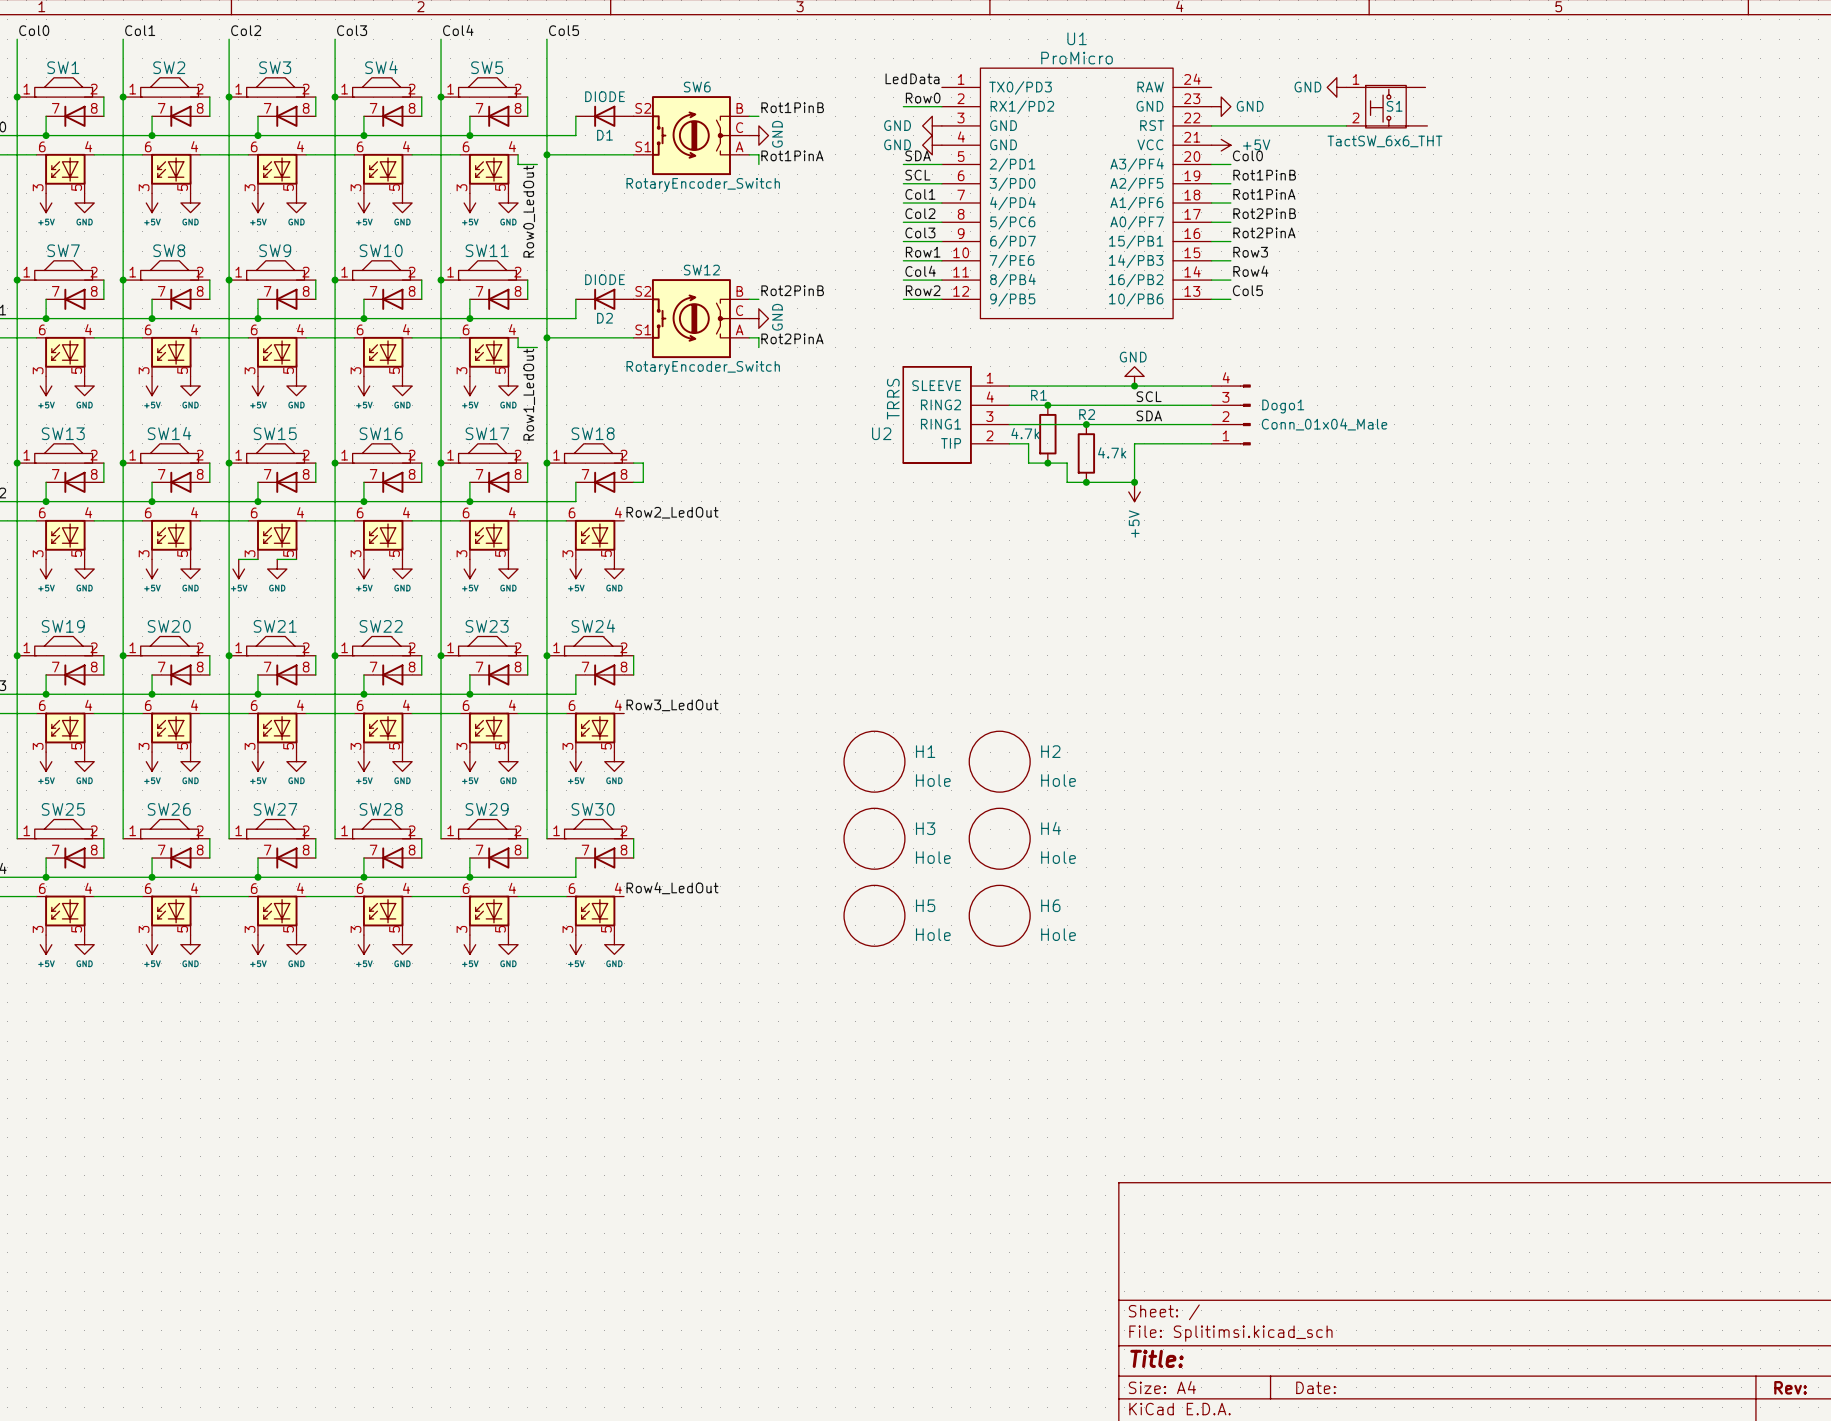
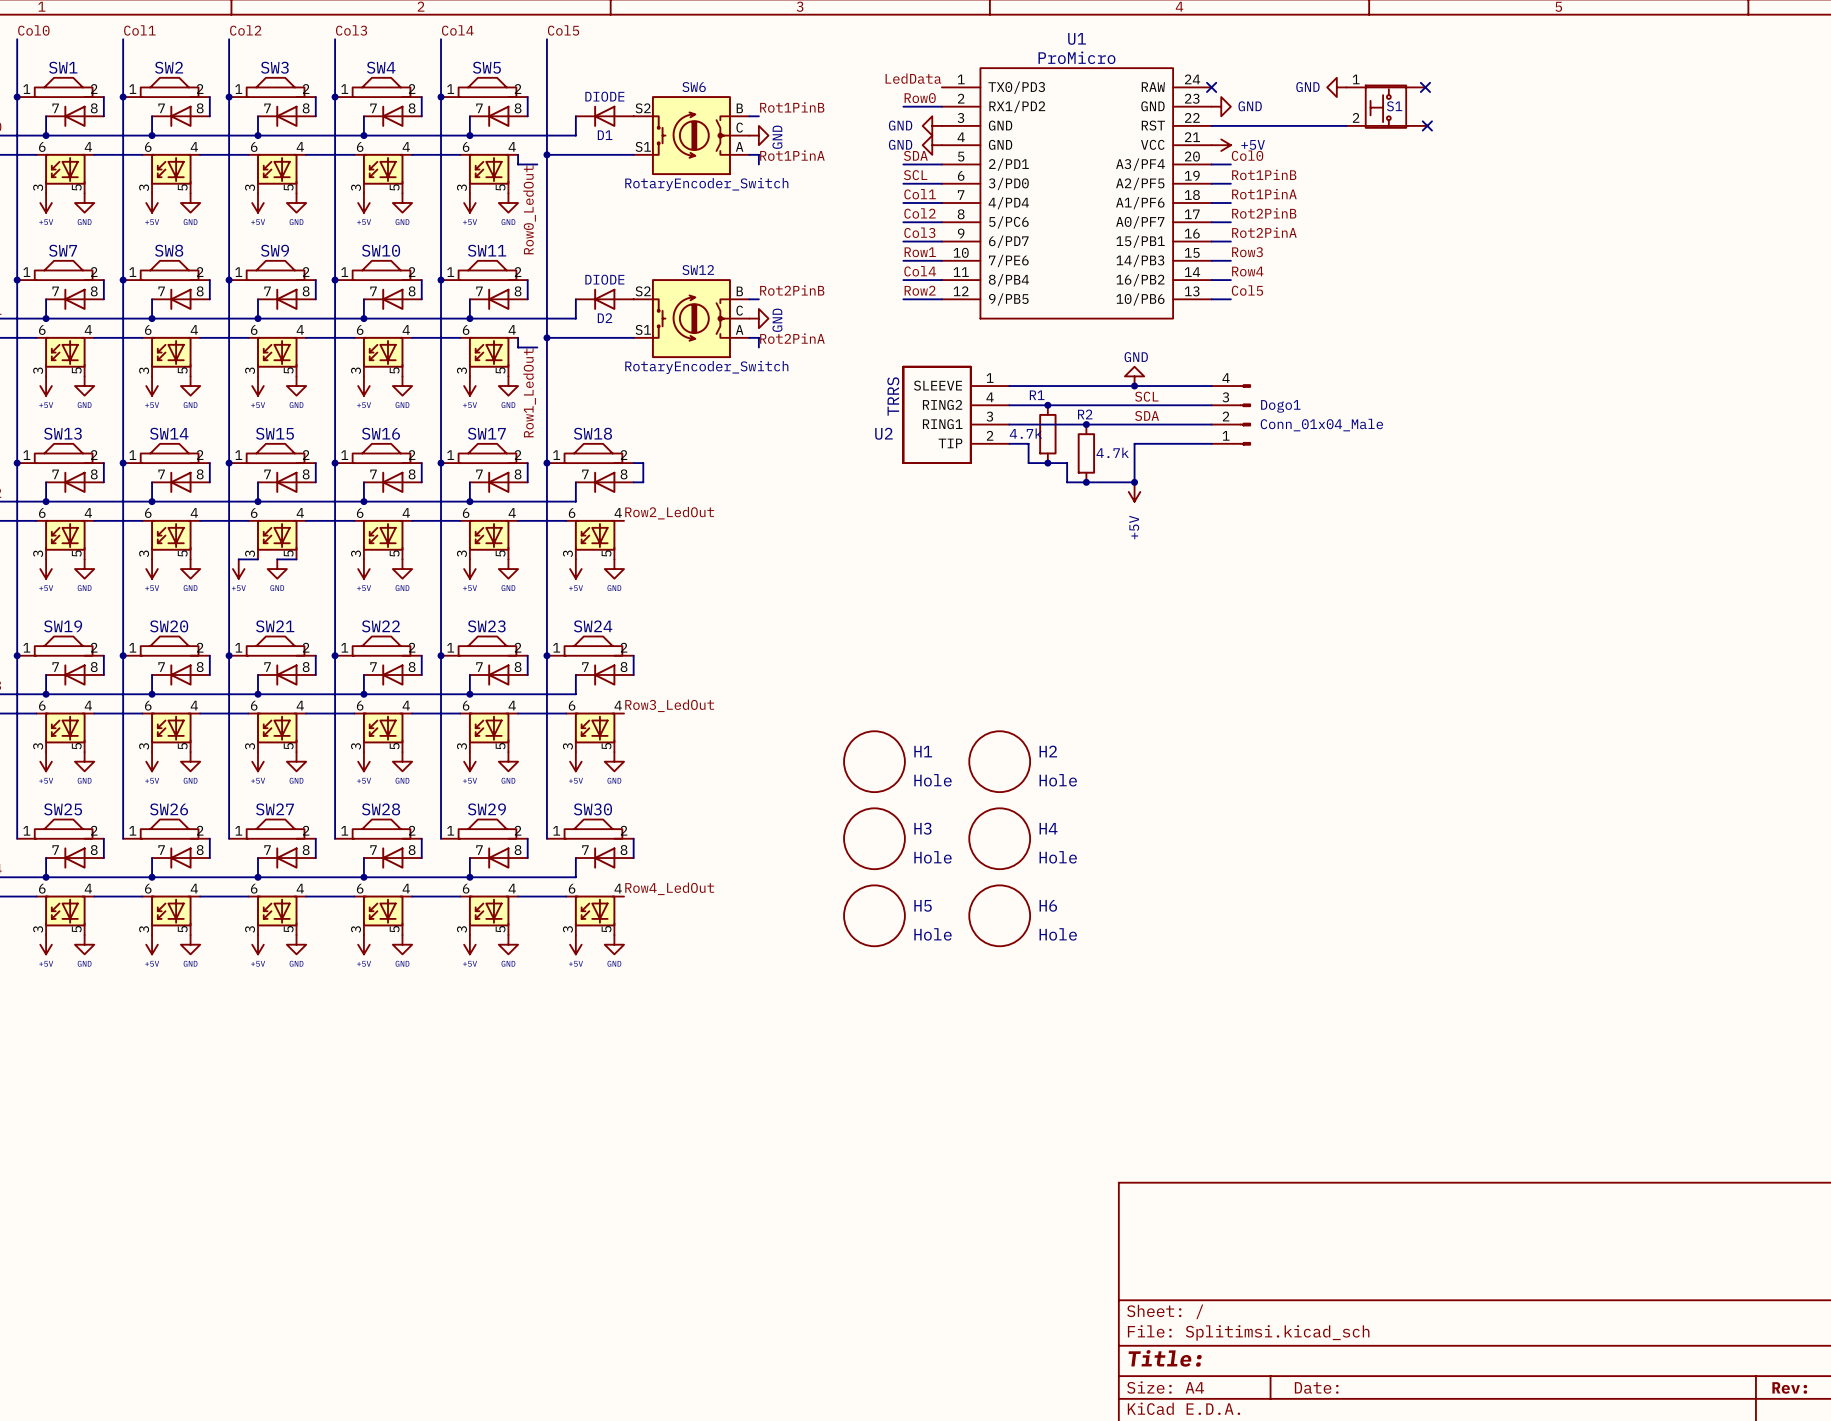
no-connect mark: none -> (1211, 87)
no-connect mark: none -> (1425, 87)
no-connect mark: none -> (1427, 125)
S1 value: TactSW_6x6_THT (1384, 141) -> none

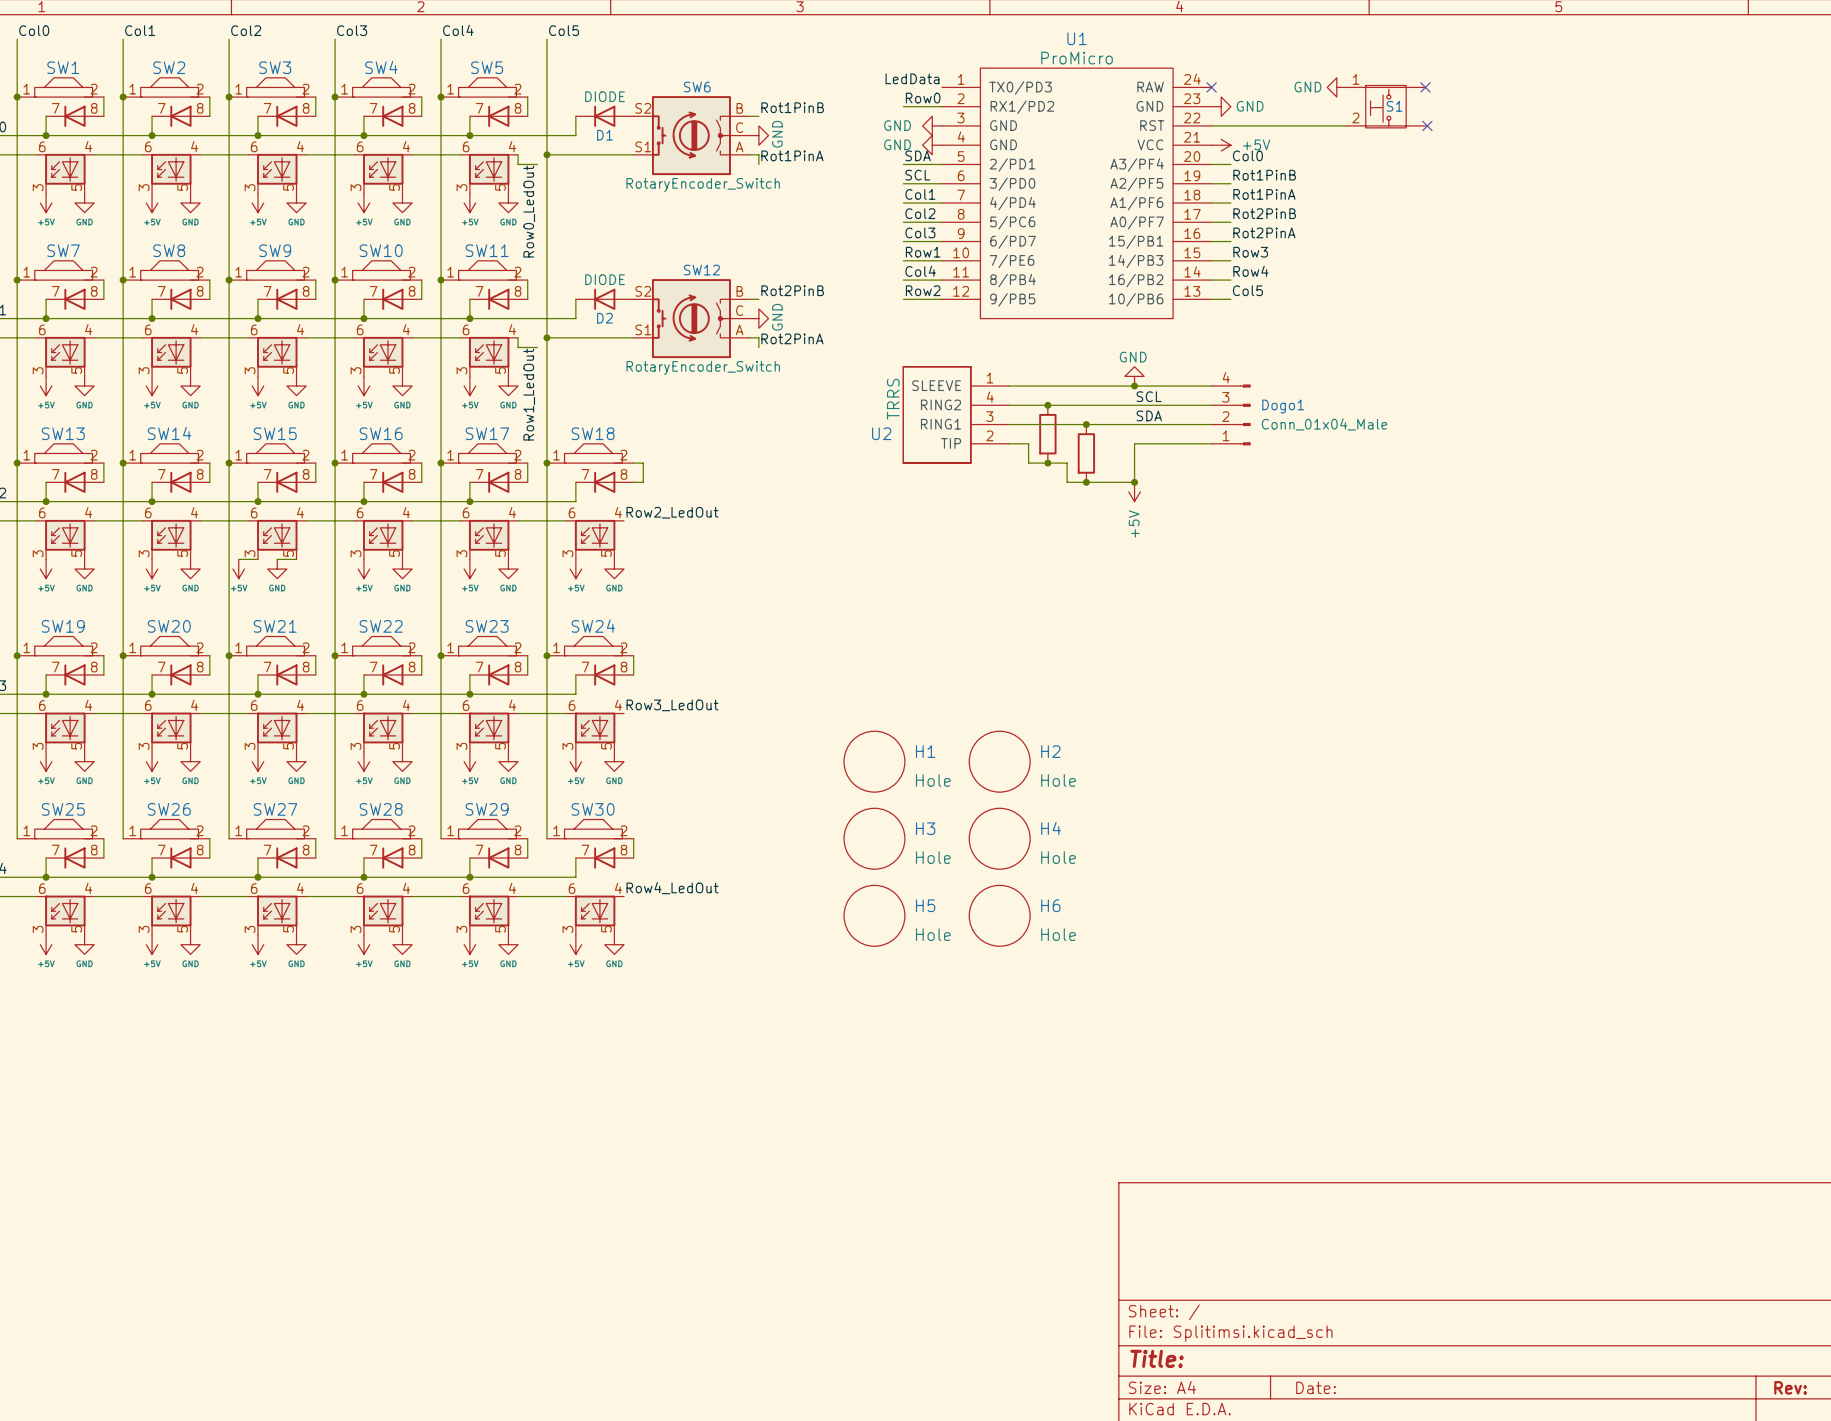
R1 name: R1 (1037, 395) -> none
R2 name: R2 (1085, 414) -> none
R1 value: 4.7k (1025, 433) -> none
R2 value: 4.7k (1112, 452) -> none

